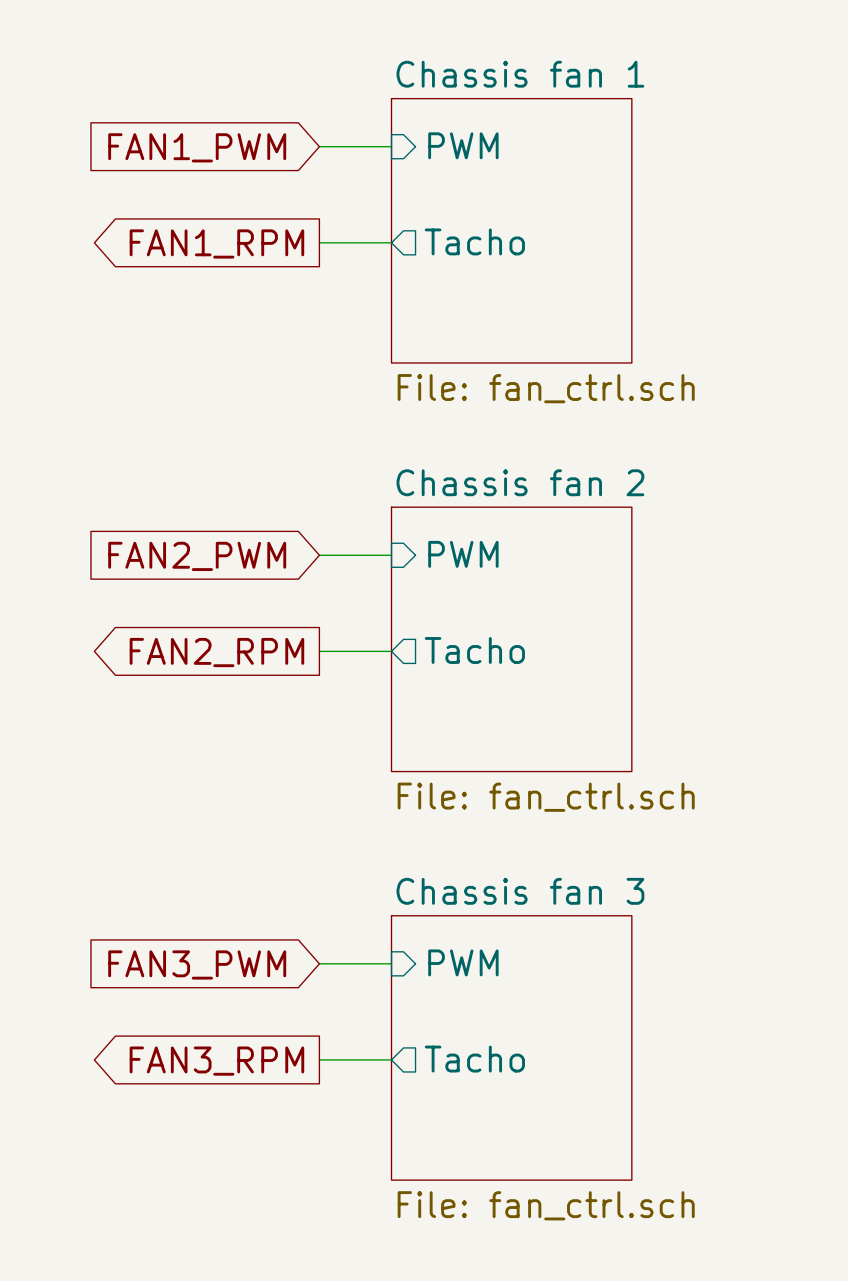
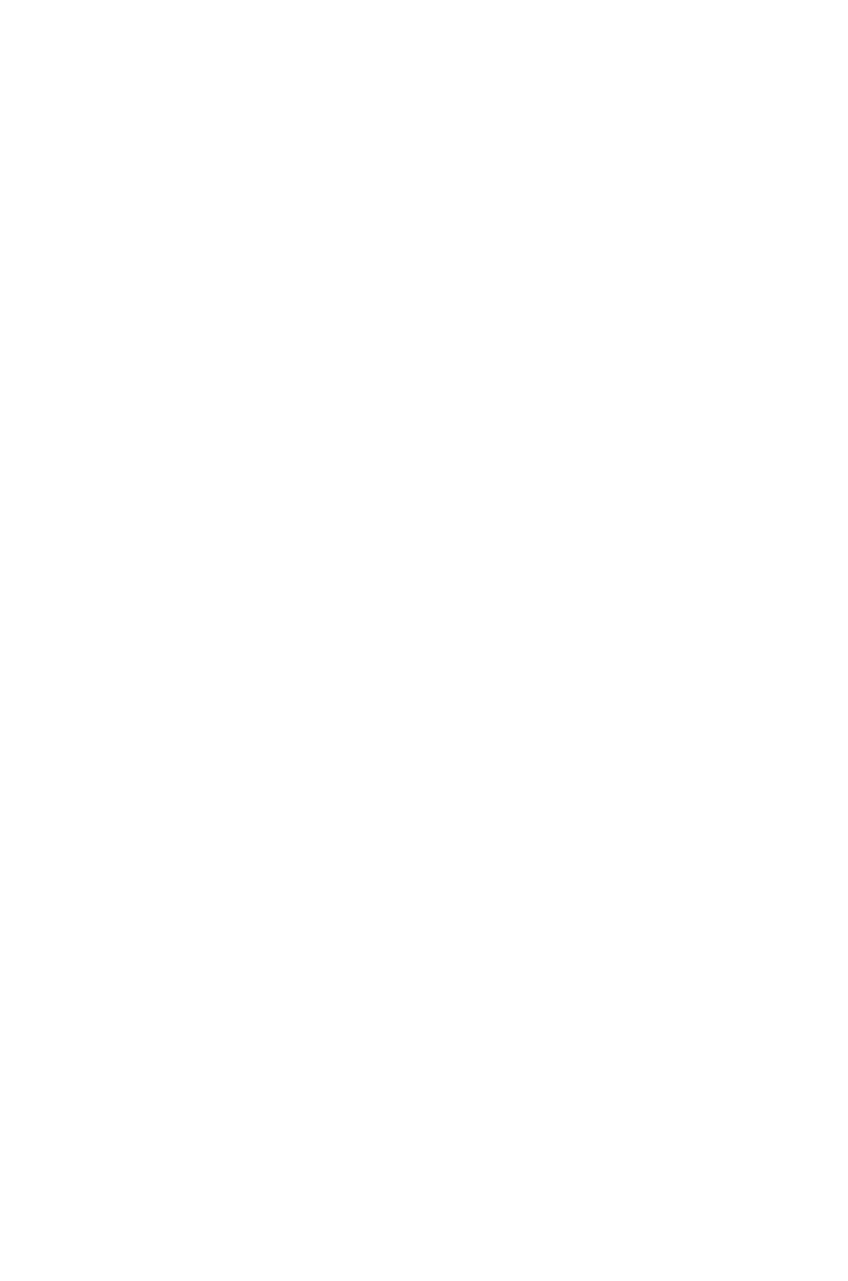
sheet pin: PWM (463, 145) -> none
wire: (319, 146) (391, 146) -> none
global label: FAN1_PWM (197, 147) -> none
sheet Chassis fan 1: File: fan_ctrl.sch (511, 230) -> none
sheet pin: Tacho (474, 241) -> none
wire: (319, 242) (391, 242) -> none
global label: FAN1_RPM (216, 243) -> none
sheet pin: PWM (463, 554) -> none
wire: (319, 555) (391, 555) -> none
global label: FAN2_PWM (197, 556) -> none
sheet Chassis fan 2: File: fan_ctrl.sch (511, 639) -> none
sheet pin: Tacho (474, 650) -> none
wire: (319, 651) (391, 651) -> none
global label: FAN2_RPM (216, 652) -> none
sheet pin: PWM (463, 962) -> none
wire: (319, 963) (391, 963) -> none
global label: FAN3_PWM (197, 964) -> none
sheet Chassis fan 3: File: fan_ctrl.sch (511, 1047) -> none
wire: (319, 1059) (391, 1059) -> none
sheet pin: Tacho (474, 1059) -> none
global label: FAN3_RPM (216, 1061) -> none

